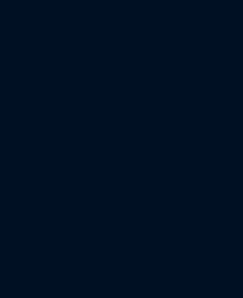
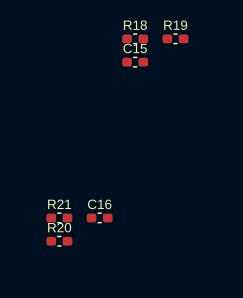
R18: none -> (135, 38)
R19: none -> (175, 38)
C15: none -> (135, 62)
R21: none -> (59, 217)
C16: none -> (99, 217)
R20: none -> (59, 241)

